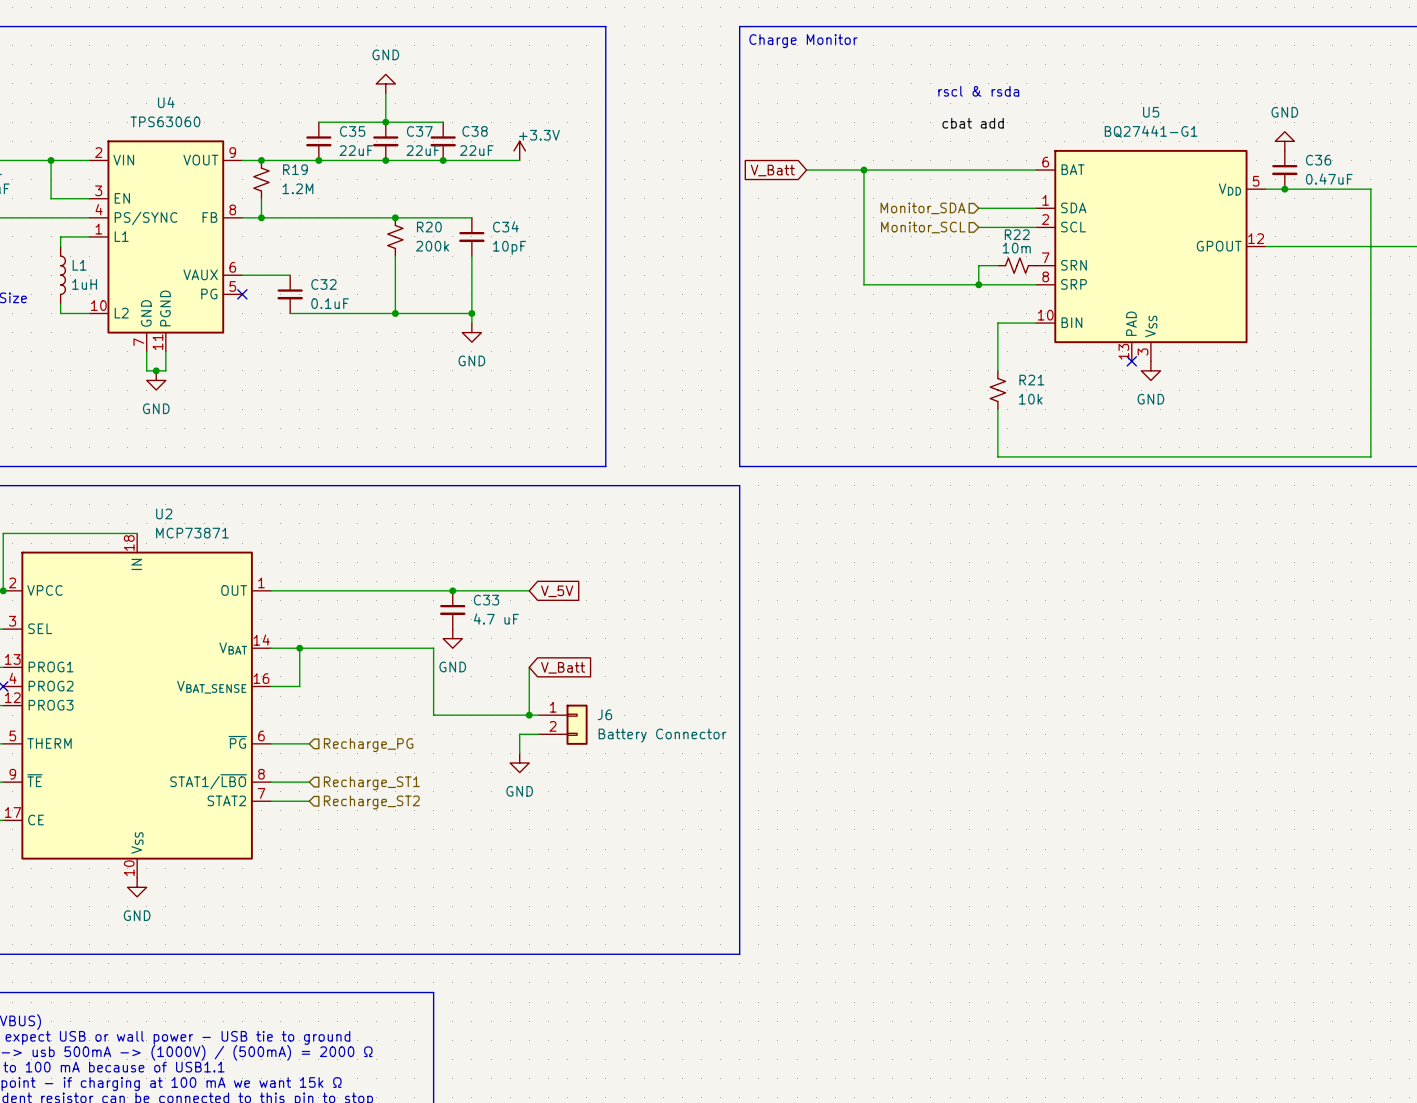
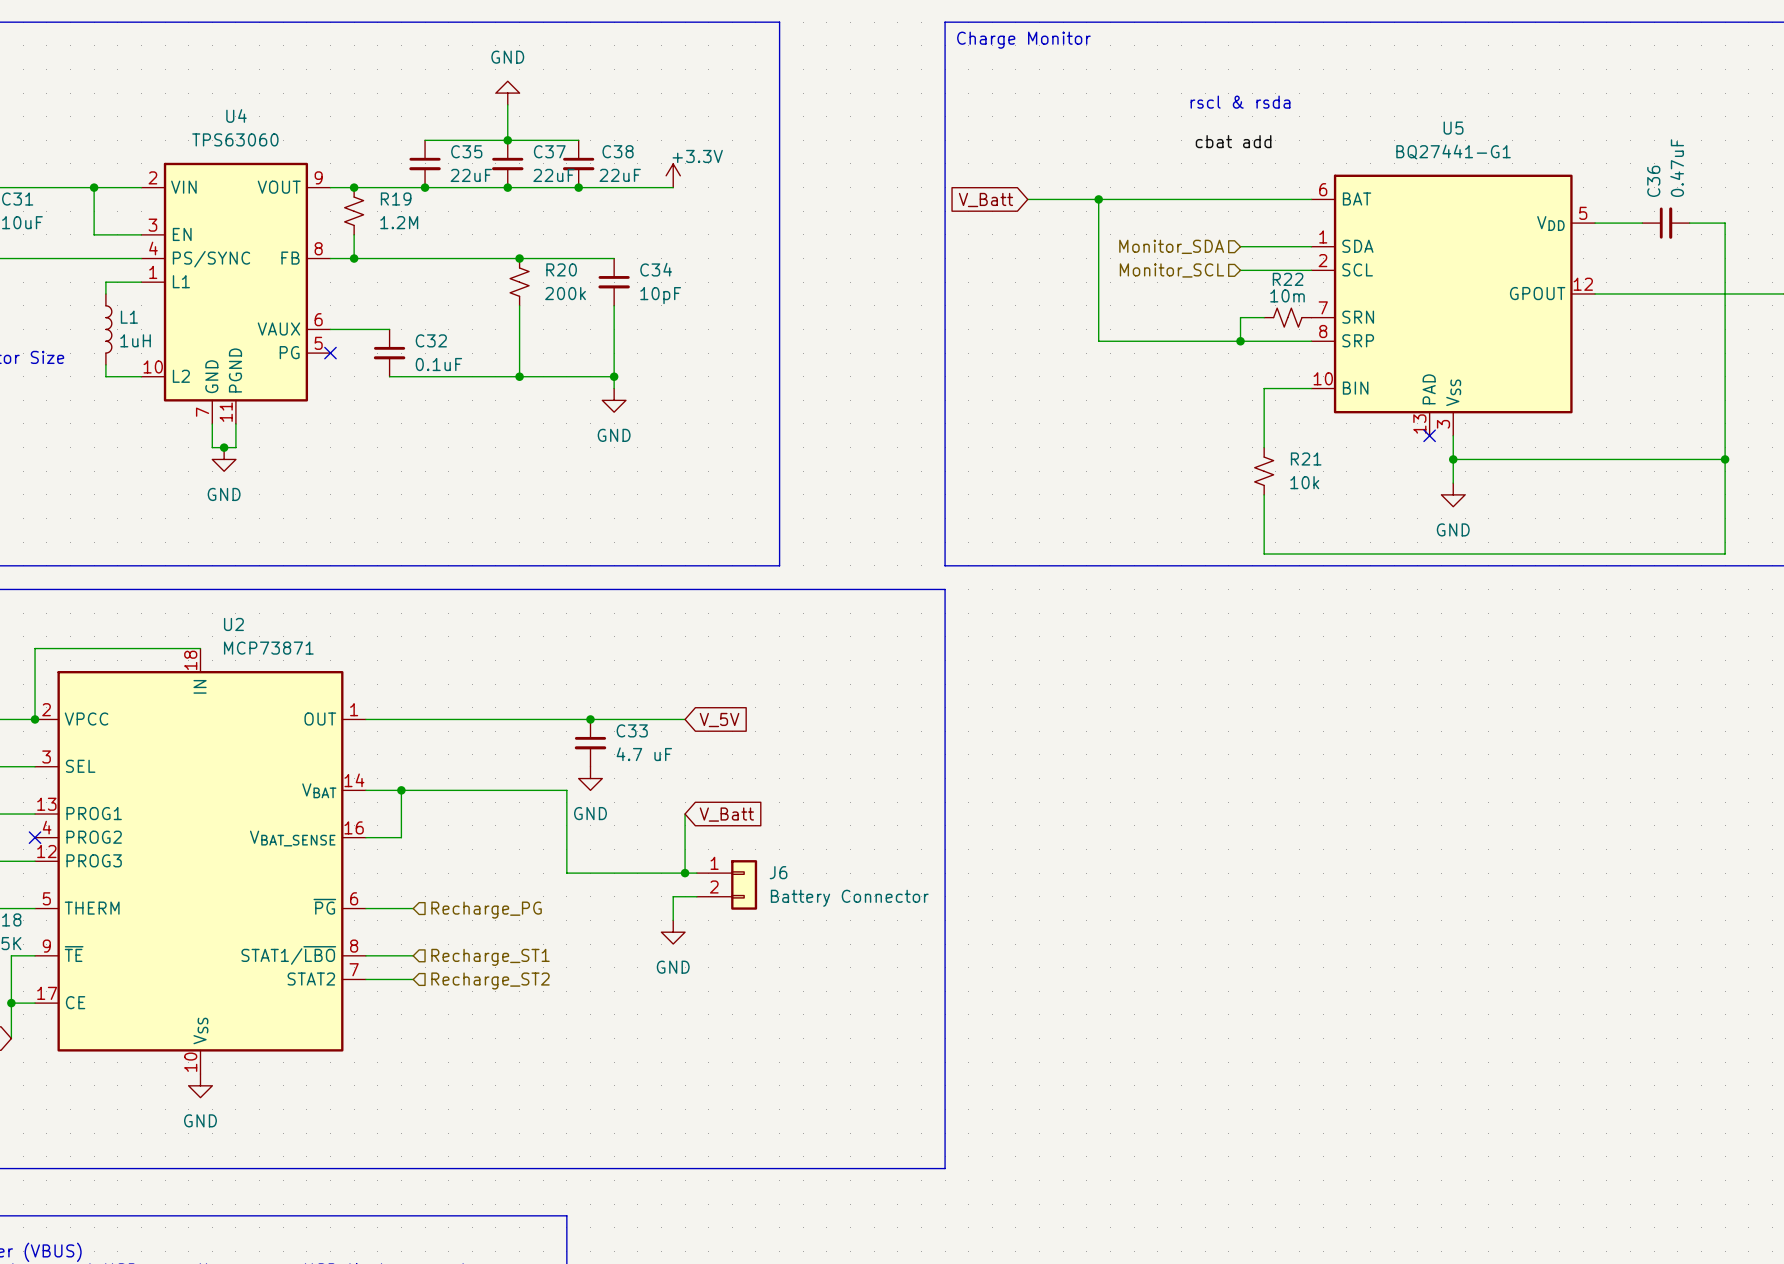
power symbol: GND (1284, 141) -> none
C36 rotation: 0° (1284, 170) -> 90° counterclockwise (1666, 223)
C36 position: (1284, 170) -> (1665, 223)
junction: (1284, 189) -> none
wire: none -> (1453, 435) (1453, 483)
power symbol position: GND (1150, 370) -> GND (1453, 494)
wire: none -> (1453, 459) (1725, 459)
junction: none -> (1453, 459)
junction: none -> (1725, 459)

